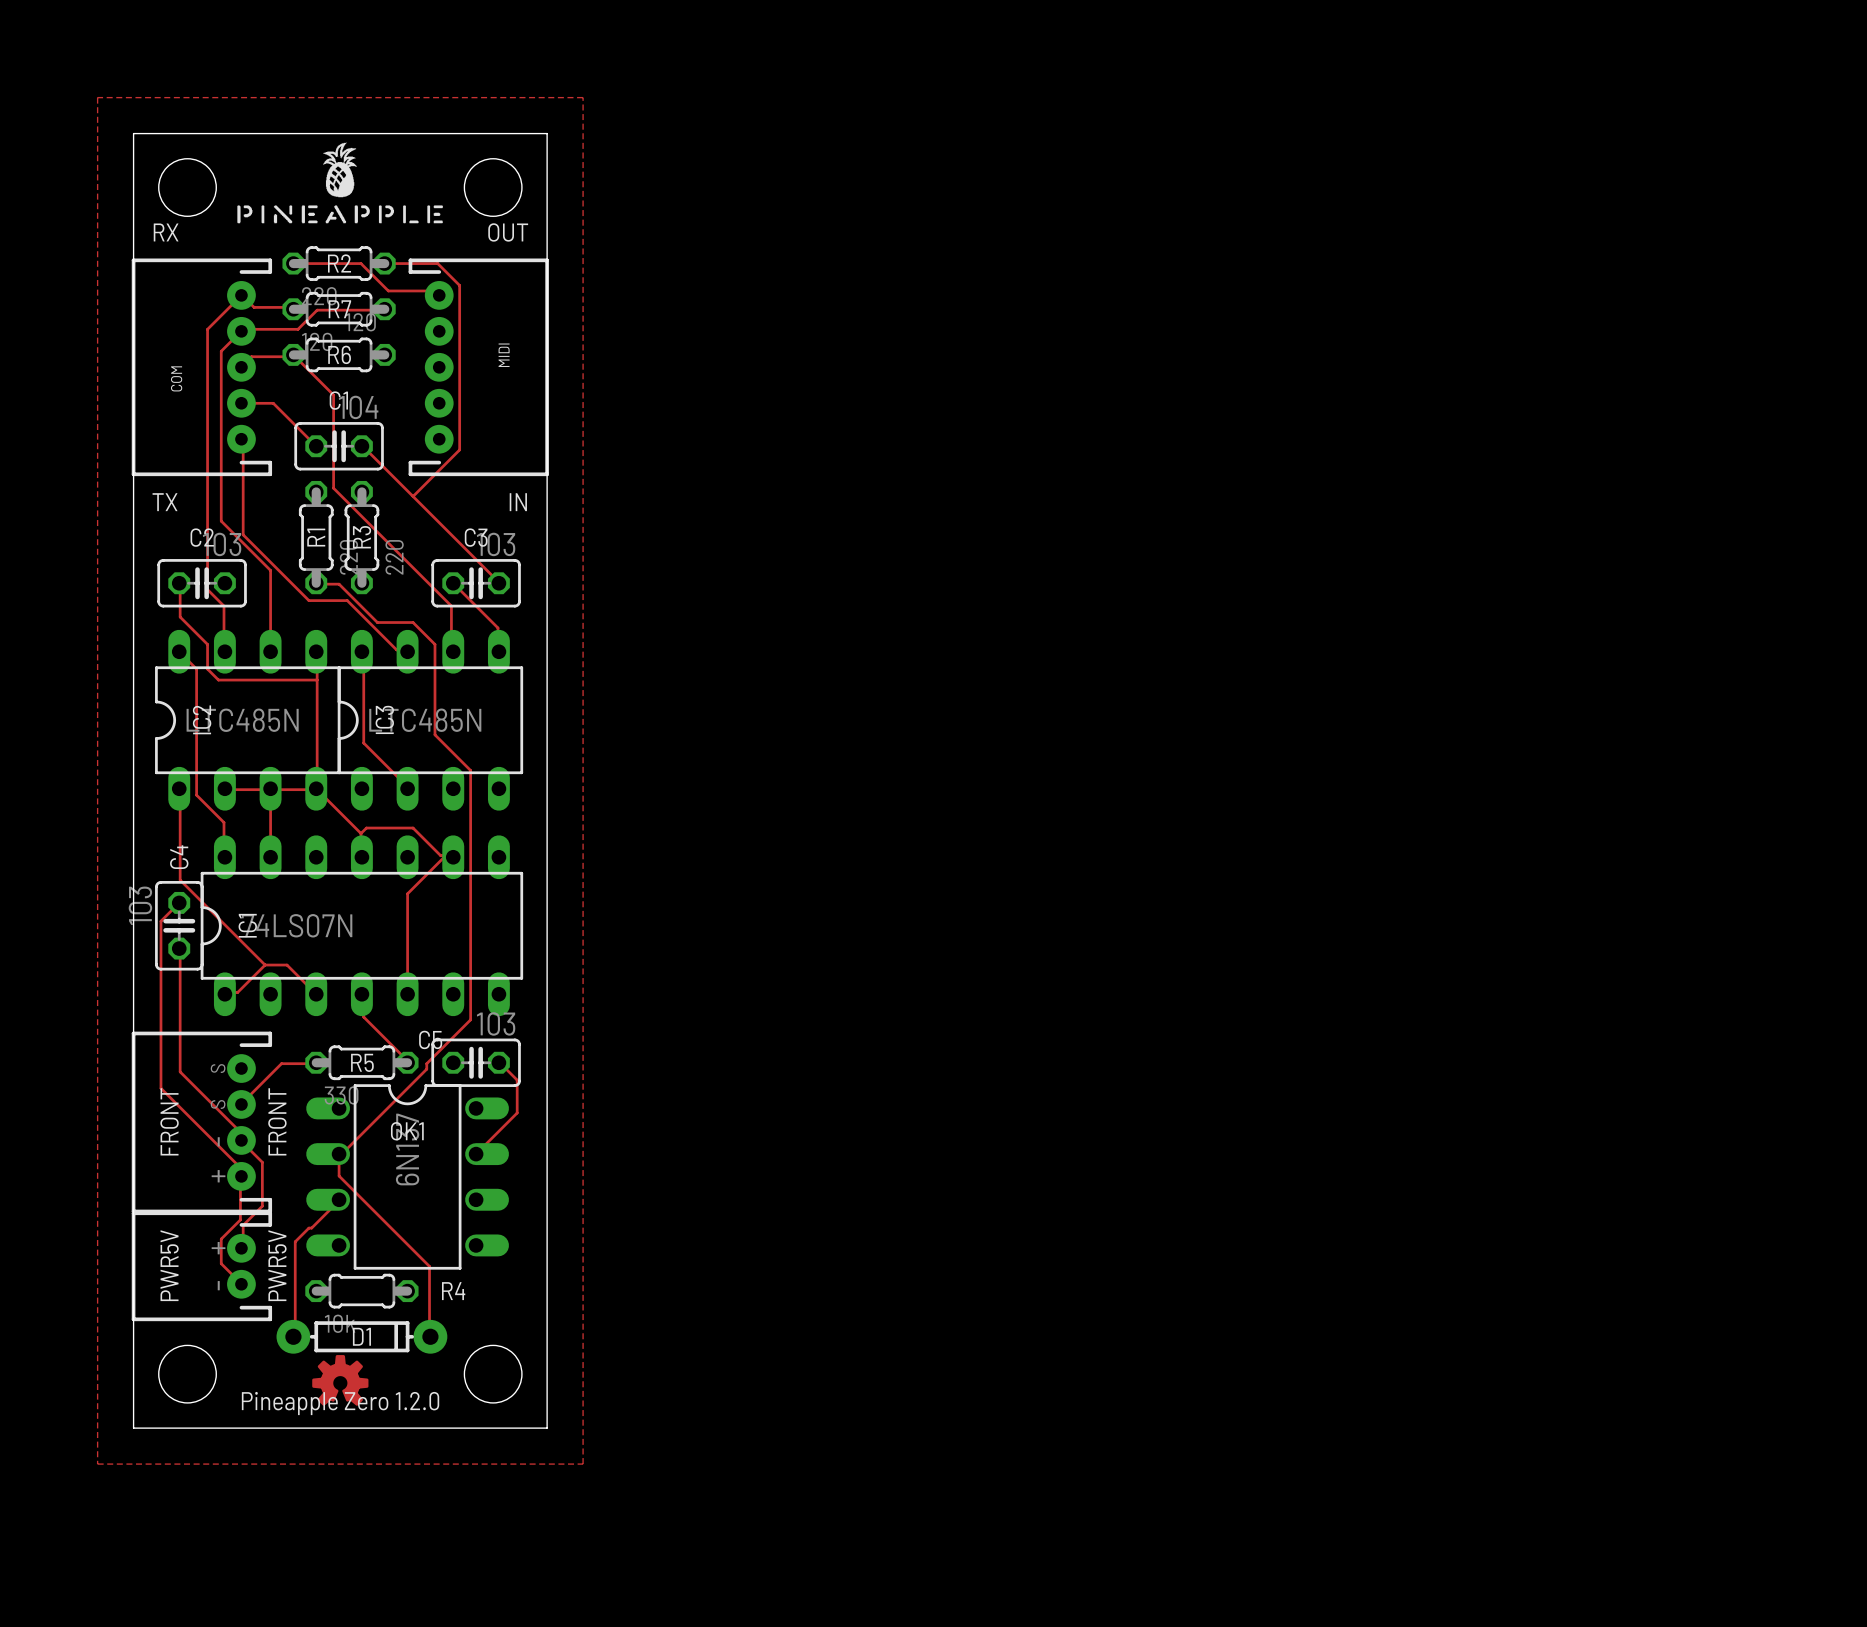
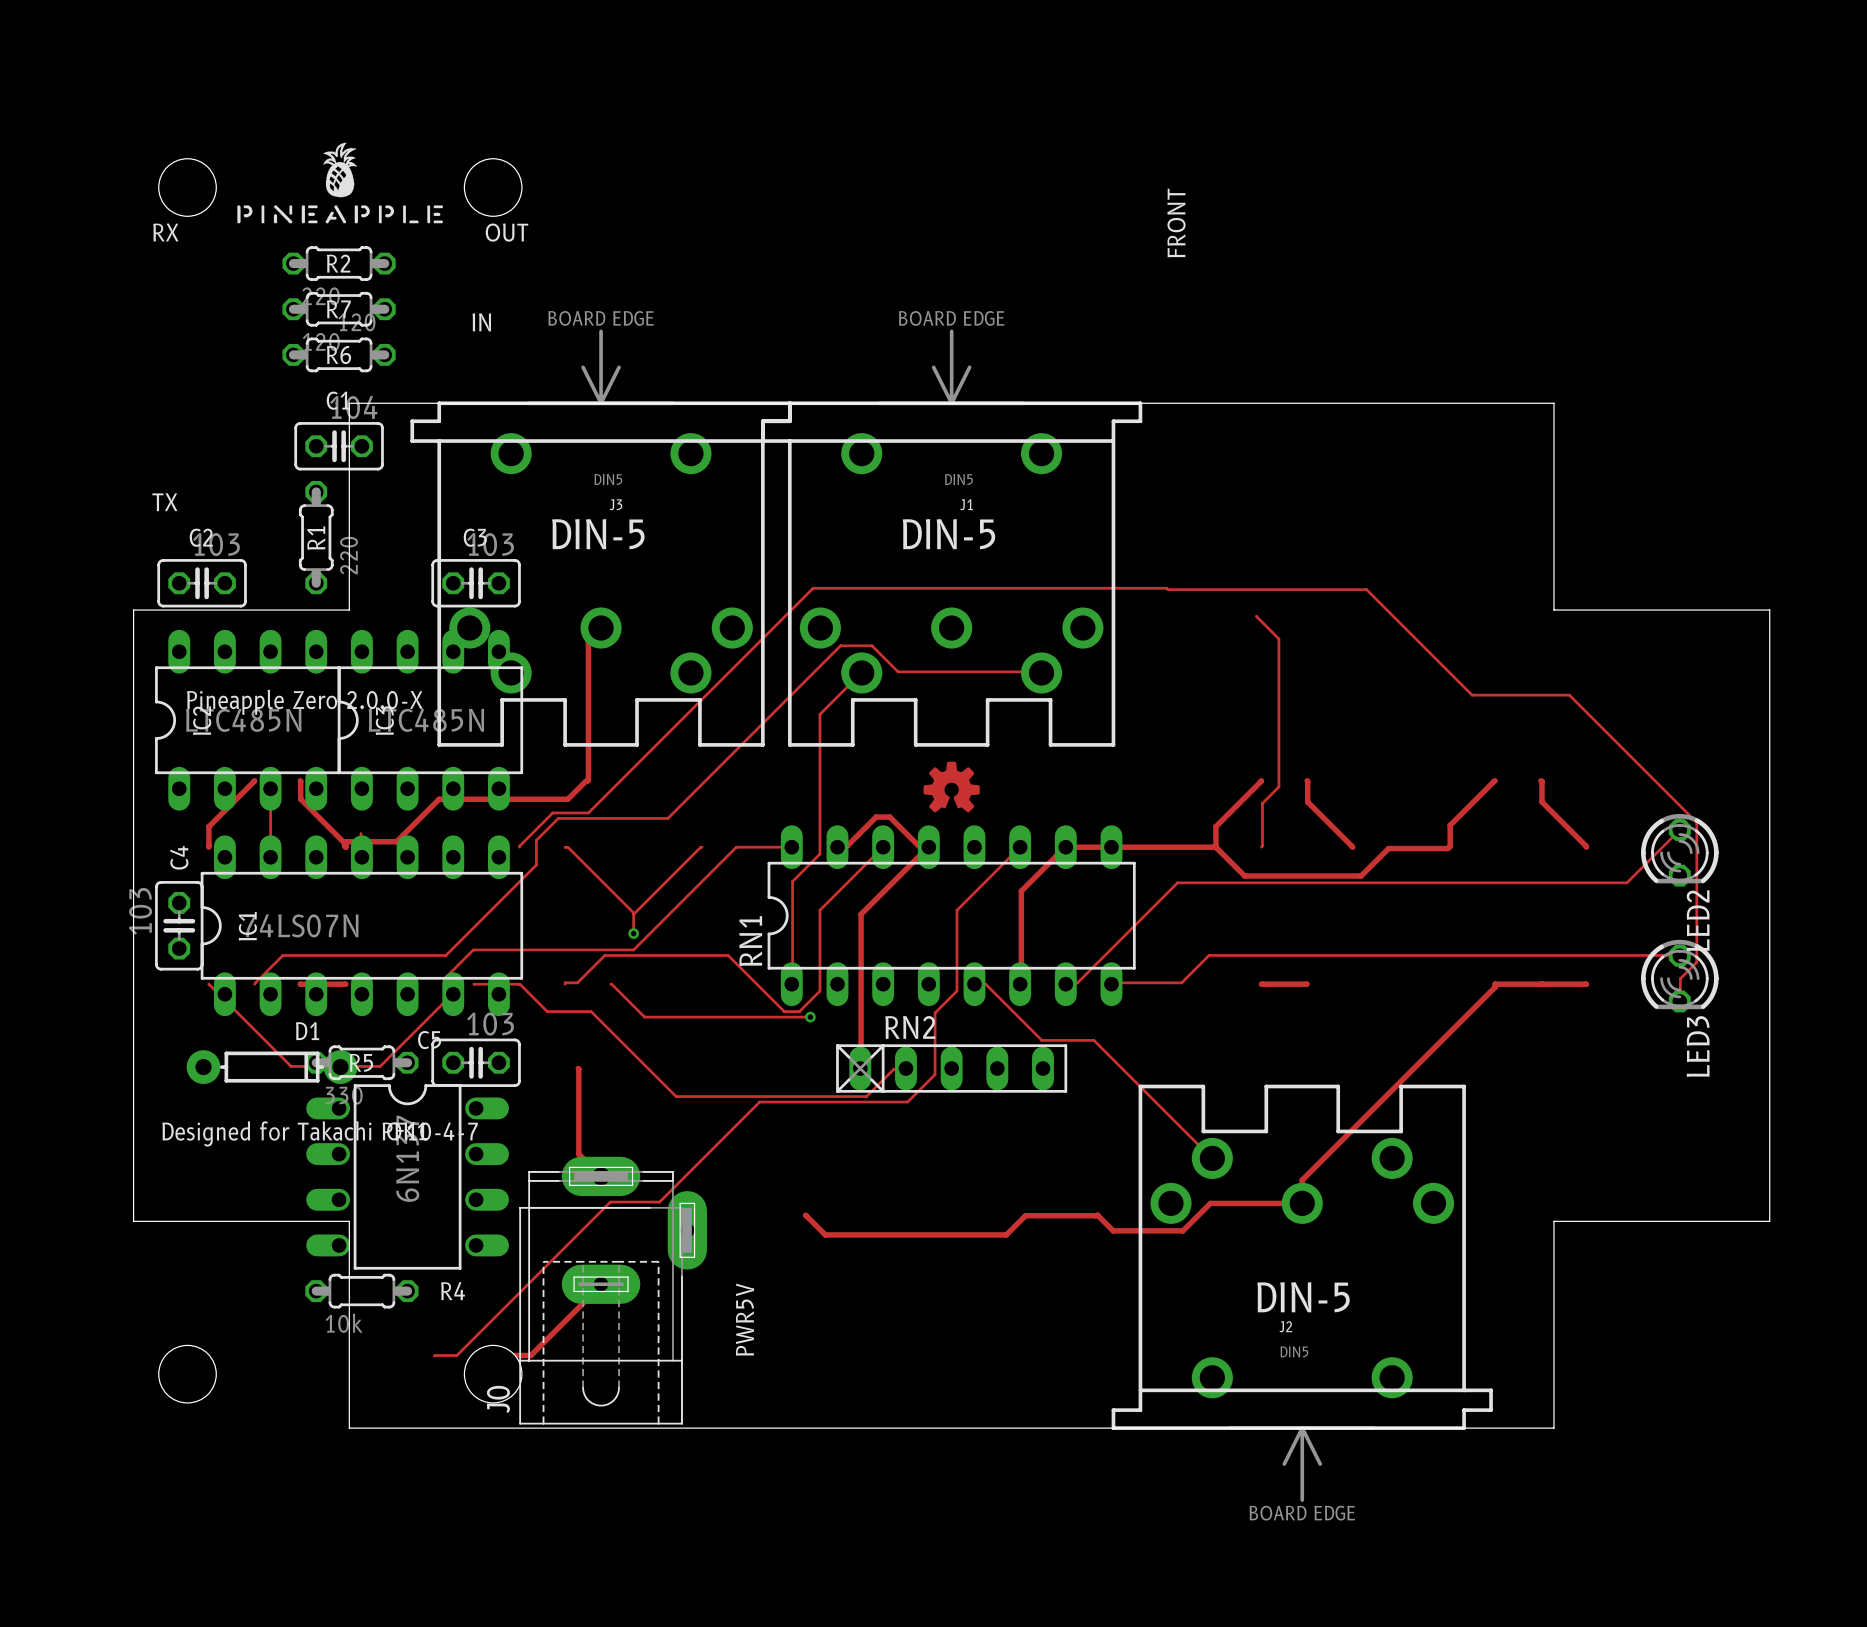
zone outline: (97, 97) (583, 97) (583, 1464) (97, 1464) (97, 97) -> none
text: none -> FRONT (1176, 223)
track: (293, 263) (361, 263) (388, 290) (434, 290) (439, 295) -> none
track: (384, 263) (437, 263) (459, 285) (459, 449) (413, 496) -> none
track: (293, 309) (292, 307) (254, 307) (241, 295) (207, 329) (207, 589) (224, 606) (224, 651) -> none
track: (384, 309) (317, 310) (297, 329) (243, 329) (221, 351) (221, 521) (270, 570) (270, 651) -> none
COM: (201, 367) -> none
track: (241, 367) (251, 356) (292, 356) (293, 354) (333, 395) (333, 488) (451, 606) (451, 649) (453, 651) -> none
MIDI: (478, 367) -> none
track: (241, 403) (273, 403) (316, 446) -> none
track: (241, 439) (243, 441) (243, 534) (308, 600) (347, 600) (396, 649) (407, 649) (407, 651) -> none
track: (361, 446) (498, 583) -> none
text position: IN (518, 502) -> IN (481, 322)
R3: 220 (361, 537) -> none
J3: none -> DIN5 (601, 538)
J1: none -> DIN5 (951, 538)
track: (179, 583) (180, 617) (207, 644) (207, 669) (218, 680) (317, 680) -> none
track: (316, 583) (339, 584) (377, 622) (413, 622) (434, 644) (434, 734) (470, 770) (470, 1019) (426, 1063) (426, 1069) (339, 1156) -> none
track: (453, 583) (498, 628) (498, 651) -> none
board edge: (133, 610) (133, 133) (547, 133) (547, 1428) -> (133, 610) (349, 610) (349, 403) (1553, 403) (1553, 610) (1769, 610) (1769, 1221) (1553, 1221) (1553, 1428) (547, 1428)
track: none -> (1256, 616) (1278, 638) (1278, 786) (1262, 803) (1261, 847)
track: none -> (601, 628) (588, 641) (588, 780) (567, 799) (439, 799) (396, 841) (345, 841) (345, 847) (344, 843) (300, 799) (300, 780)
track: (179, 651) (196, 669) (196, 795) (224, 822) (224, 857) -> none
track: (316, 651) (316, 788) -> none
track: (361, 651) (363, 652) (363, 743) (407, 788) -> none
track: none -> (861, 672) (819, 714) (819, 854) (792, 881) (791, 984)
track: none -> (1041, 672) (898, 671) (872, 645) (840, 645) (667, 818) (558, 818) (536, 840) (536, 865) (445, 955) (282, 955) (254, 984)
text: none -> Pineapple Zero 2.0.0-X (304, 702)
drawing: none -> [923, 761, 980, 813]
track: none -> (254, 780) (208, 826) (208, 847)
track: none -> (1261, 780) (1215, 826) (1215, 847)
track: none -> (1307, 780) (1307, 802) (1352, 847)
track: none -> (1495, 780) (1450, 825) (1449, 847) (1388, 848) (1361, 875) (1244, 875) (1215, 847)
track: none -> (1540, 780) (1541, 802) (1586, 847)
track: (179, 788) (180, 880) (265, 965) -> none
track: (224, 788) (316, 788) -> none
track: (316, 788) (361, 833) (366, 828) (413, 828) (440, 855) (451, 855) (453, 857) (445, 855) (407, 893) (407, 994) -> none
track: none -> (1679, 829) (1626, 882) (1177, 882) (1077, 982) (1065, 984)
track: none -> (519, 847) (552, 812) (588, 812) (813, 588) (1366, 589) (1472, 695) (1569, 695) (1696, 822) (1696, 962) (1680, 978) (1679, 1001)
track: none -> (565, 847) (567, 847) (634, 913)
track: none -> (702, 847) (633, 914) (633, 933)
track: none -> (791, 847) (736, 847) (633, 949) (473, 949) (444, 978) (444, 1002) (380, 1066) (291, 1066) (208, 984)
track: none -> (837, 847) (847, 845) (876, 817) (889, 817) (922, 849) (928, 847) (861, 914) (860, 1068)
track: none -> (882, 847) (819, 910) (819, 991) (799, 1011) (784, 1011) (728, 955) (604, 955) (577, 982) (565, 984)
track: none -> (1020, 847) (956, 910) (956, 991) (935, 1012) (935, 1074) (907, 1102) (759, 1102) (659, 1202) (610, 1202) (456, 1355) (434, 1356)
track: none -> (1215, 847) (1065, 847) (1021, 891) (1020, 984)
LED2: none -> (1679, 850)
track: (179, 902) (160, 921) (160, 1088) (240, 1167) (240, 1219) (221, 1239) (221, 1263) (241, 1284) -> none
RN1: none -> (951, 915)
via: none -> (633, 933)
track: (179, 948) (180, 1071) (240, 1132) (240, 1140) (262, 1162) (262, 1206) (243, 1225) (243, 1247) (241, 1248) -> none
track: none -> (1679, 955) (1209, 955) (1181, 982) (1111, 984)
track: (265, 965) (237, 992) (226, 992) (224, 994) -> none
track: (265, 965) (287, 965) (316, 994) -> none
LED3: none -> (1679, 976)
track: none -> (300, 984) (345, 984)
track: none -> (473, 984) (519, 984) (547, 1011) (591, 1011) (676, 1096) (866, 1096) (893, 1069) (905, 1068)
track: none -> (610, 984) (644, 1017) (810, 1017)
track: none -> (974, 984) (985, 984) (1041, 1040) (1093, 1040) (1212, 1158)
track: none -> (1261, 984) (1307, 984)
track: none -> (1495, 984) (1495, 986) (1302, 1180) (1302, 1203) (1210, 1203) (1183, 1230) (1113, 1230) (1097, 1215) (1025, 1215) (1006, 1234) (825, 1234) (805, 1215)
track: none -> (1495, 984) (1540, 984)
track: none -> (1540, 984) (1586, 984)
track: (361, 994) (363, 995) (363, 1017) (407, 1062) -> none
via: none -> (810, 1017)
track: (316, 1062) (281, 1063) (241, 1104) -> none
track: (498, 1062) (517, 1080) (517, 1113) (476, 1154) -> none
track: none -> (578, 1068) (578, 1154) (601, 1176)
RN2: none -> (951, 1068)
text: FRONT (277, 1121) -> none
FRONT: (201, 1122) -> none
text: none -> Designed for Takachi PF10-4-7 (320, 1133)
track: (339, 1154) (339, 1176) (429, 1266) (430, 1336) -> none
track: (339, 1199) (295, 1241) (295, 1334) (293, 1336) -> none
board edge: (133, 1221) (133, 1428) (349, 1428) -> (133, 1221) (349, 1221) (349, 1428)
text: PWR5V (277, 1265) -> none
PWR5V: (201, 1266) -> none
track: none -> (601, 1284) (530, 1355) (480, 1356)
J0: none -> (613, 1290)
J2: none -> DIN5 (1302, 1293)
text: none -> PWR5V (745, 1319)
D1 position: (361, 1336) -> (272, 1067)
D1 name position: D1 (361, 1336) -> D1 (307, 1031)
drawing: [312, 1355, 369, 1406] -> none
text: Pineapple Zero 1.2.0 (340, 1403) -> none

